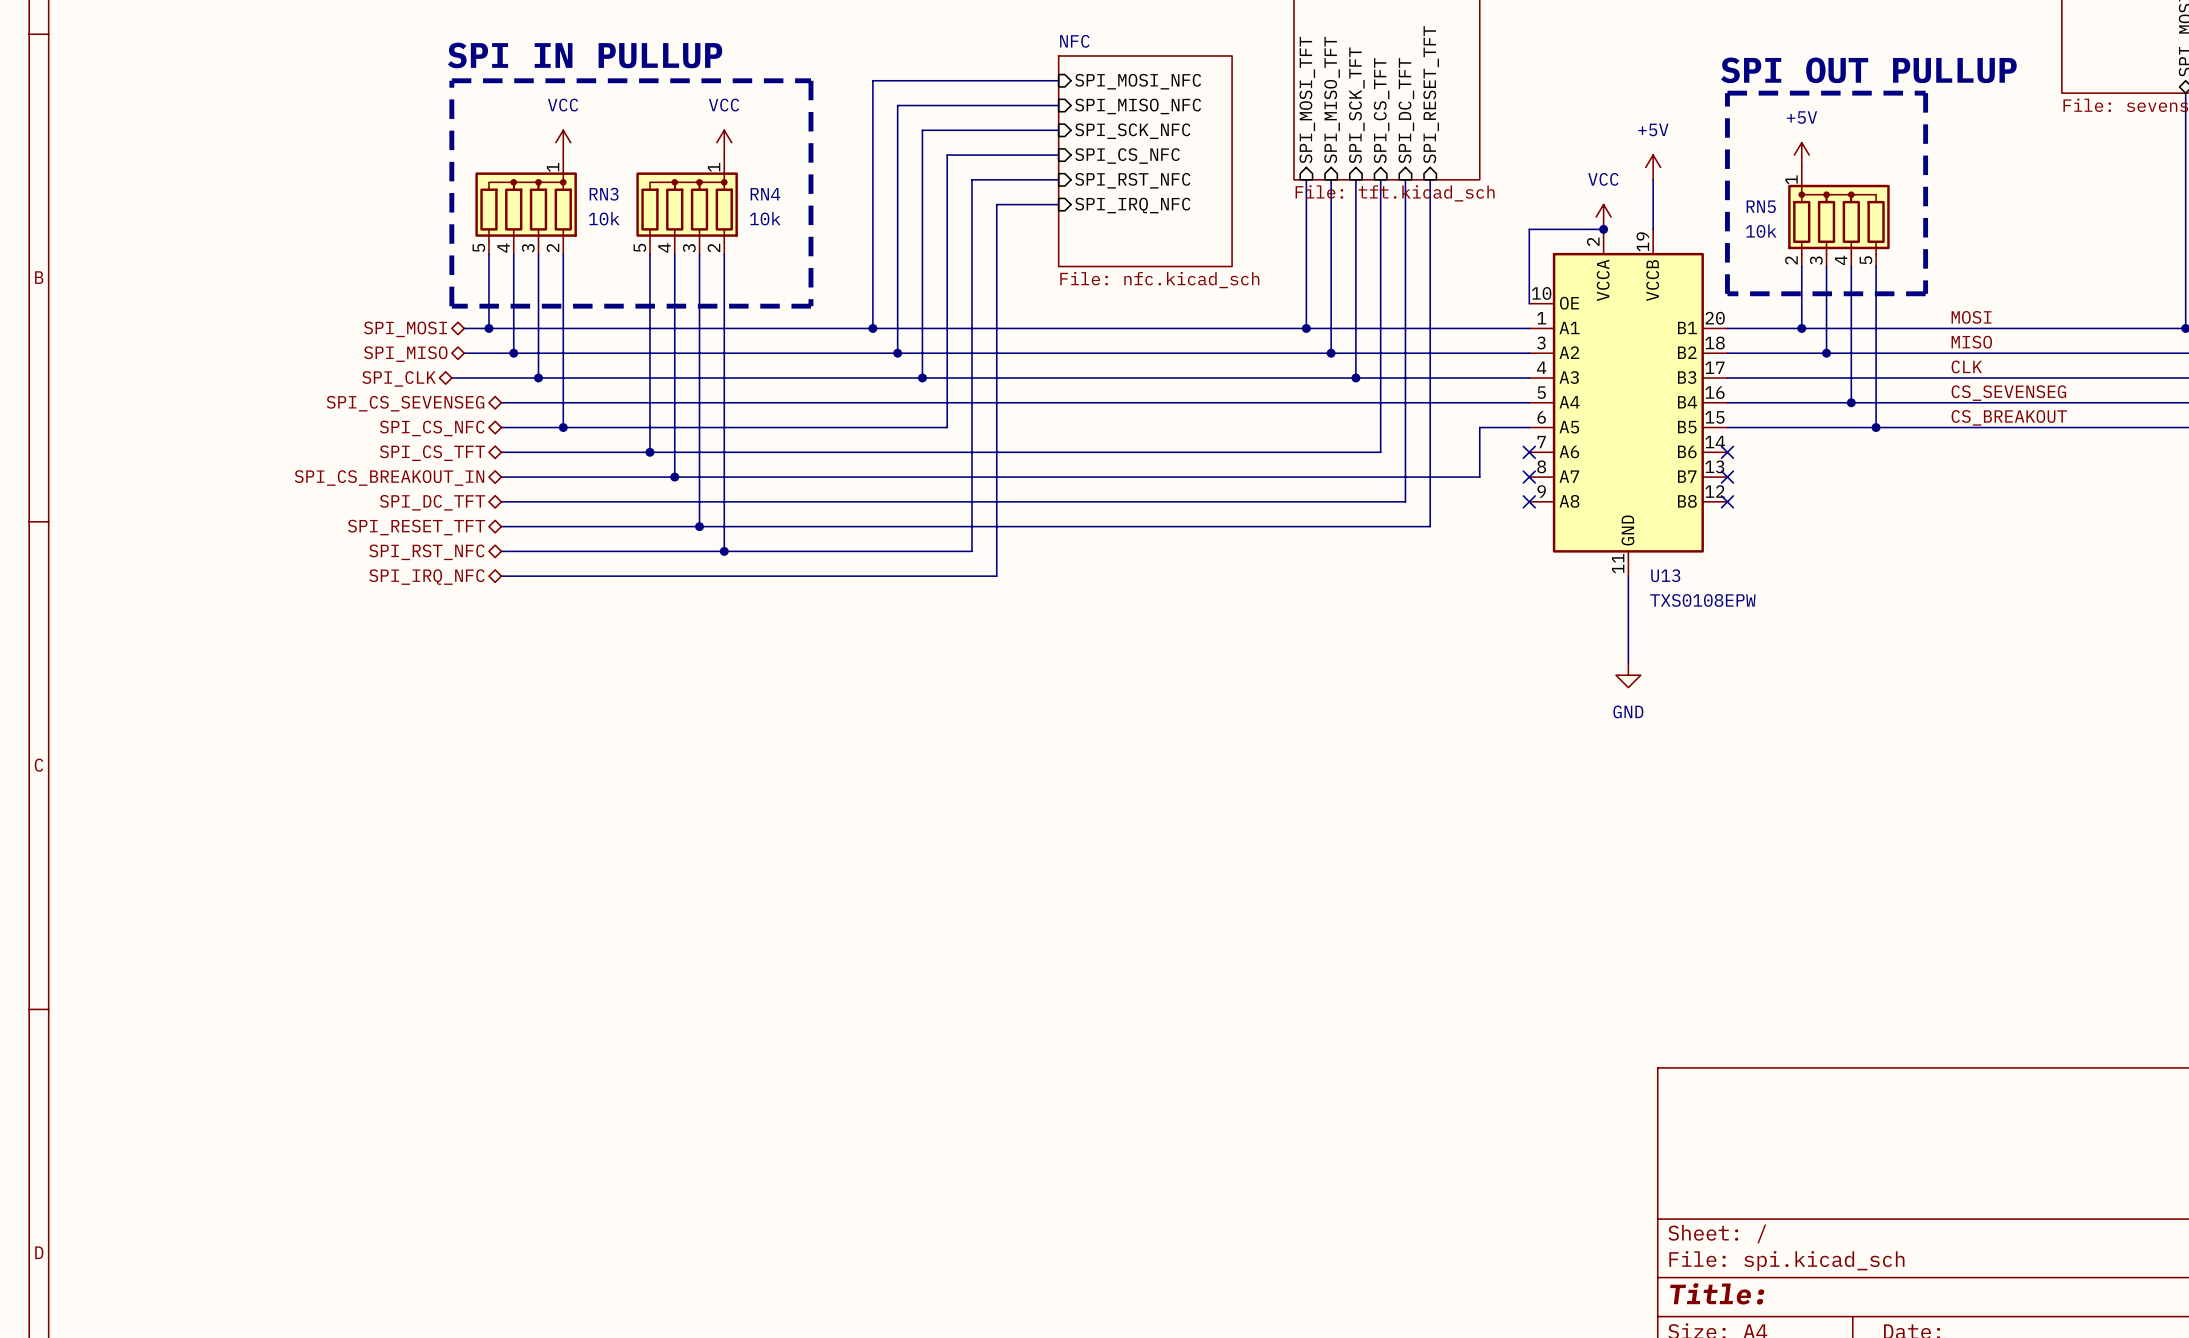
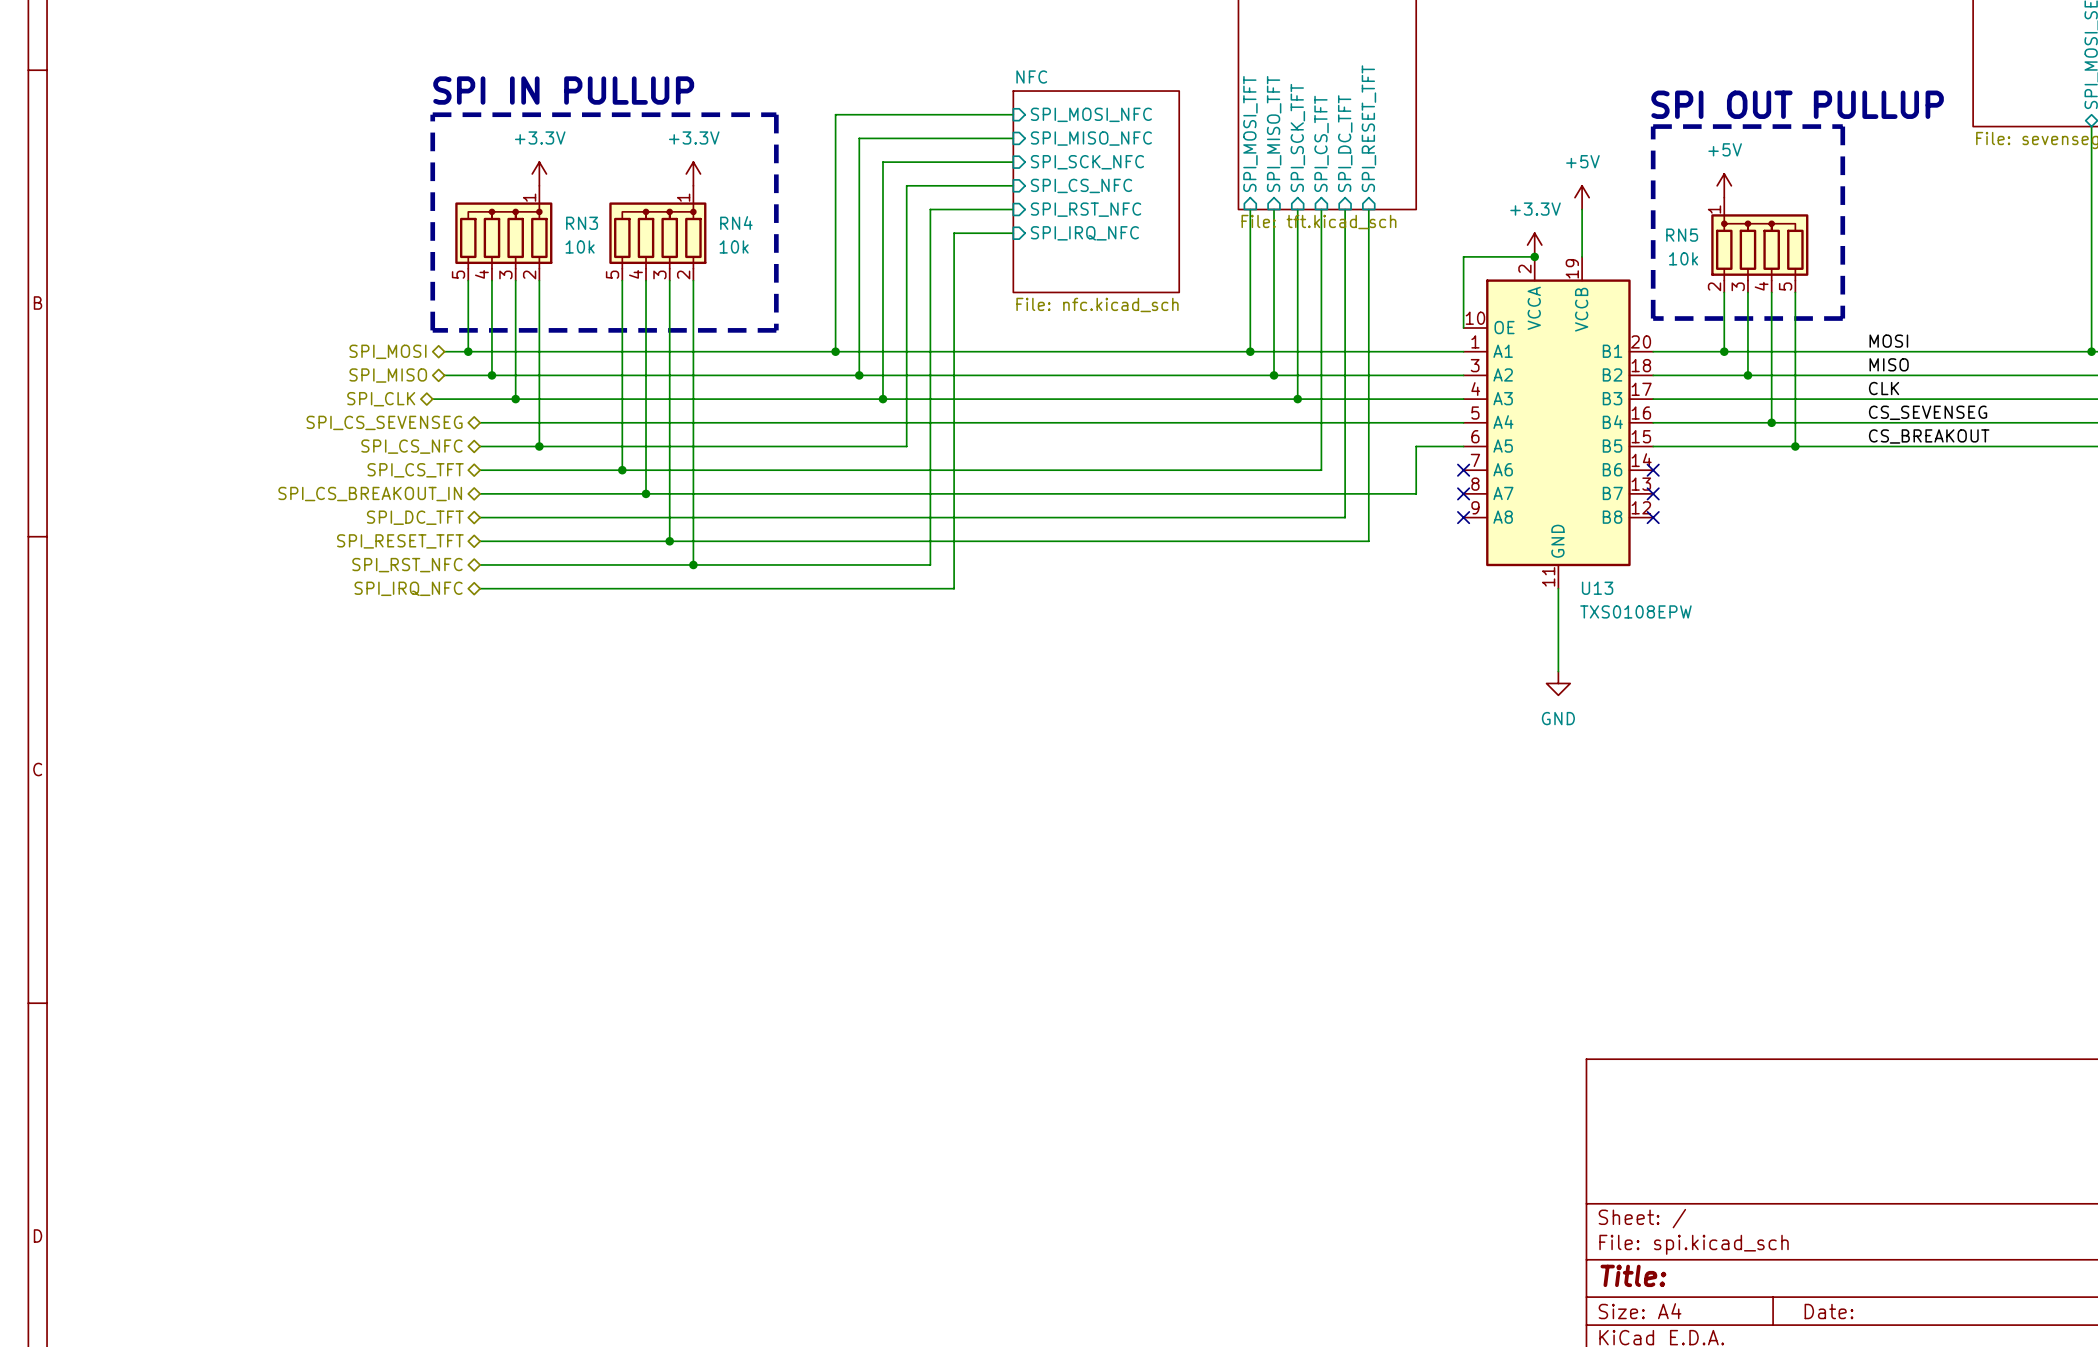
power symbol: VCC (563, 142) -> +3.3V (539, 173)
power symbol: VCC (724, 142) -> +3.3V (693, 173)
power symbol: VCC (1603, 216) -> +3.3V (1534, 245)

